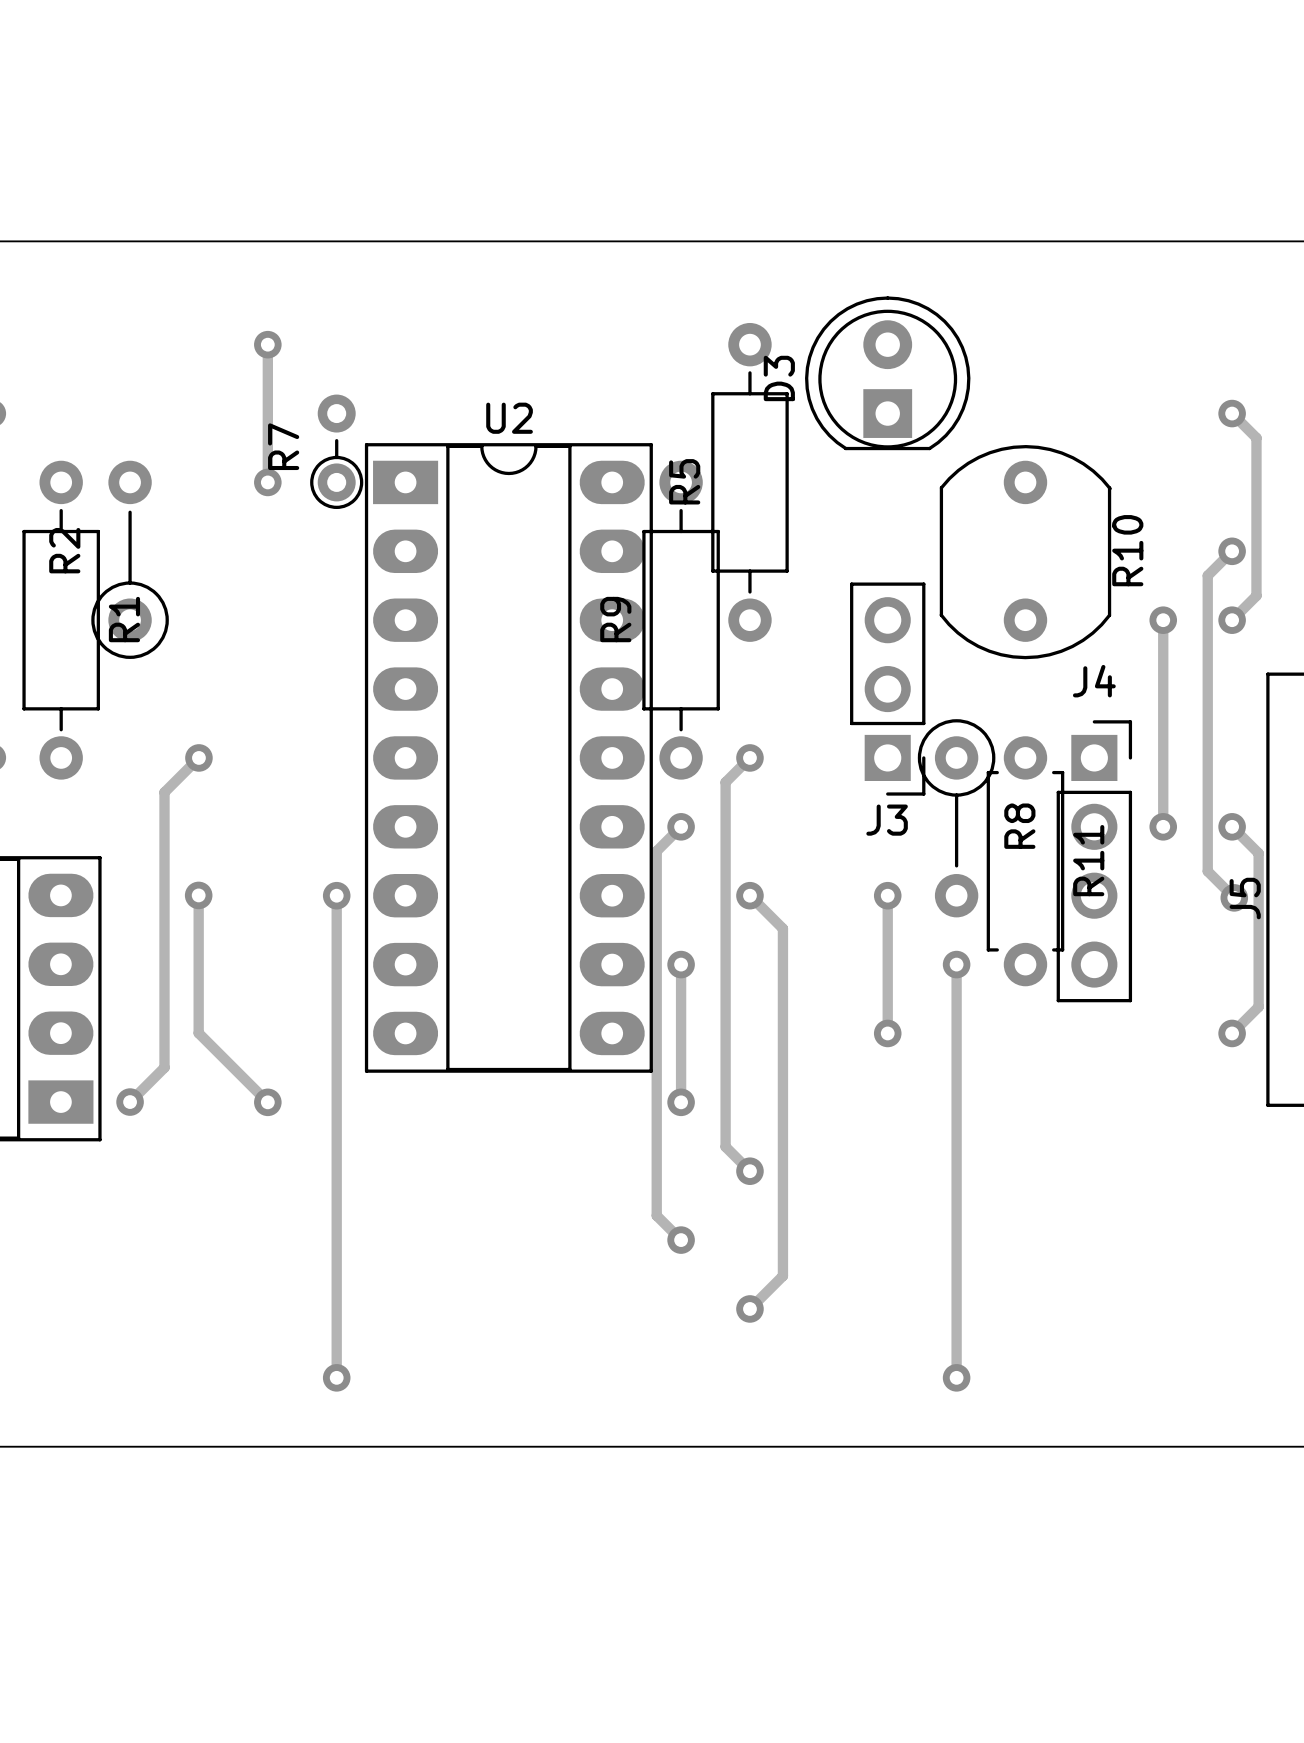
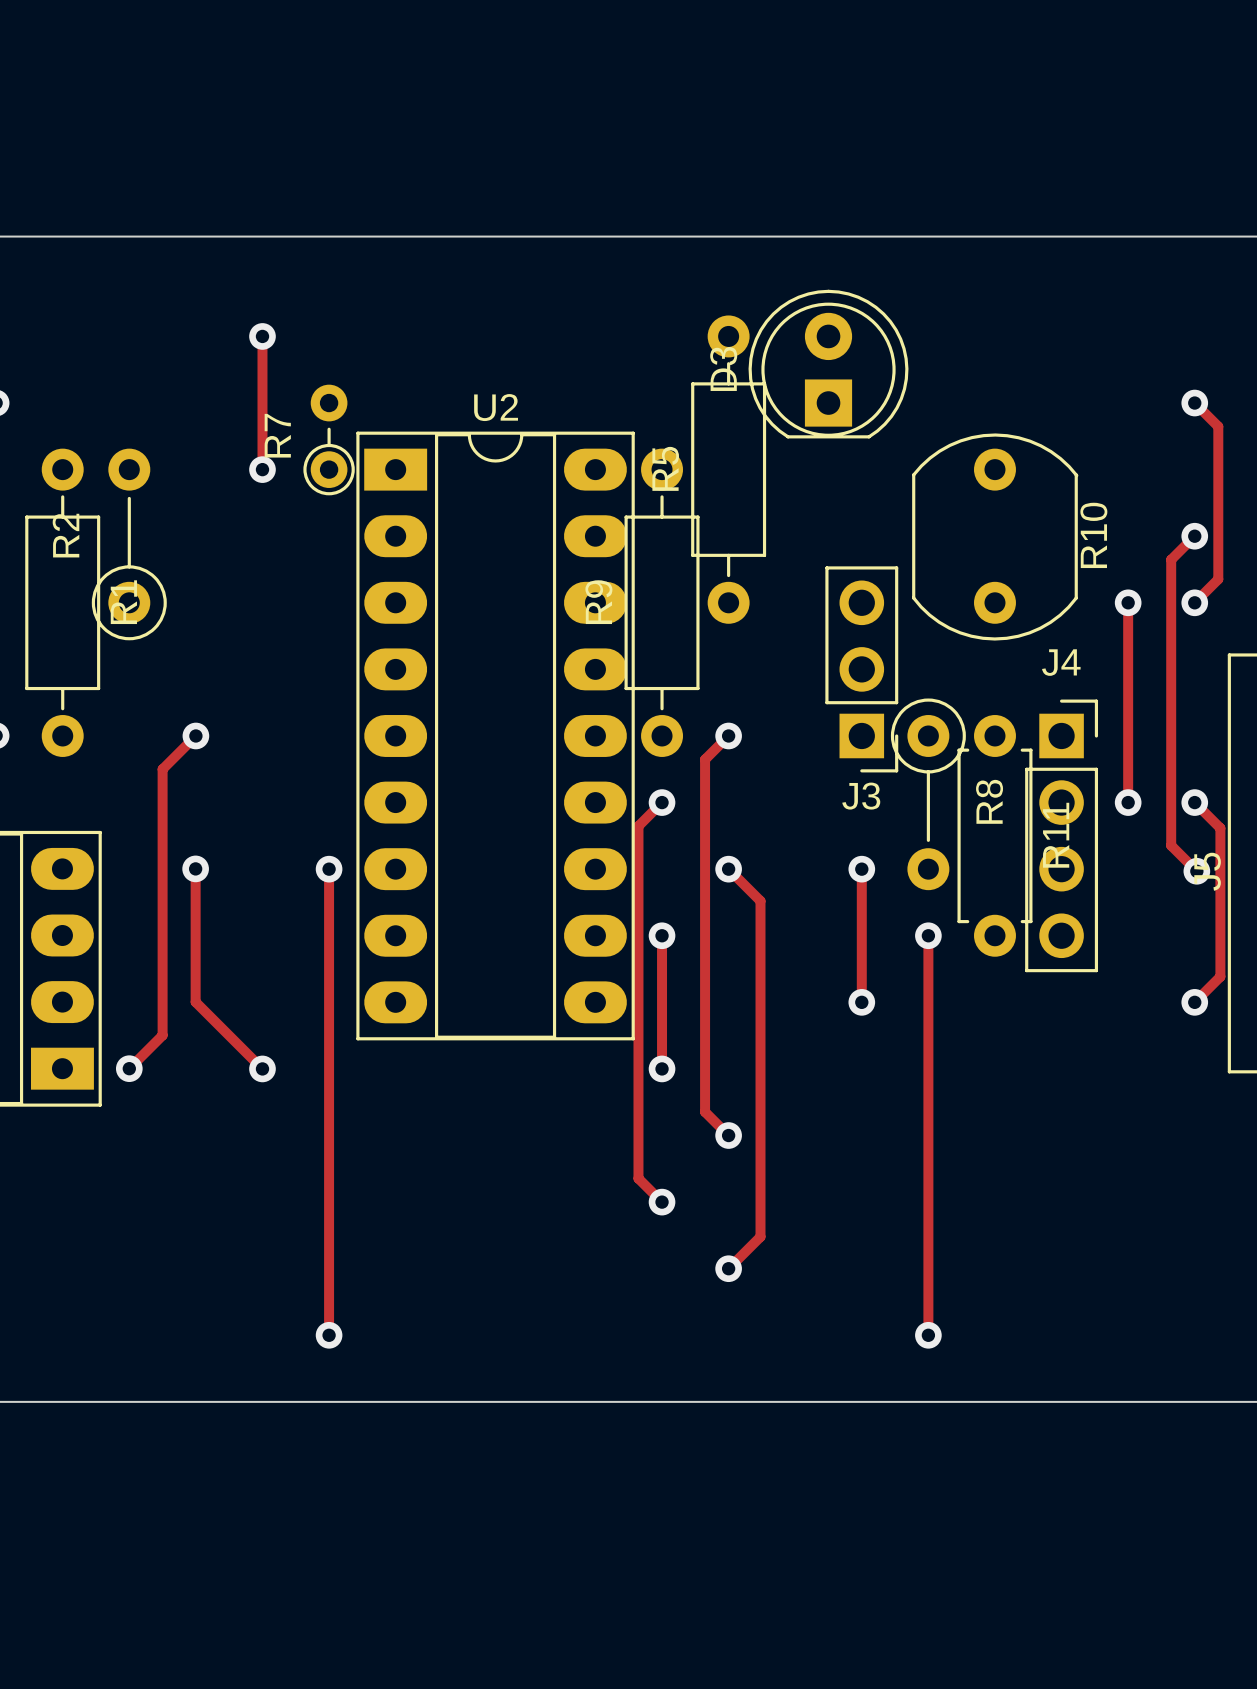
D3 position: (887, 373) -> (828, 364)

